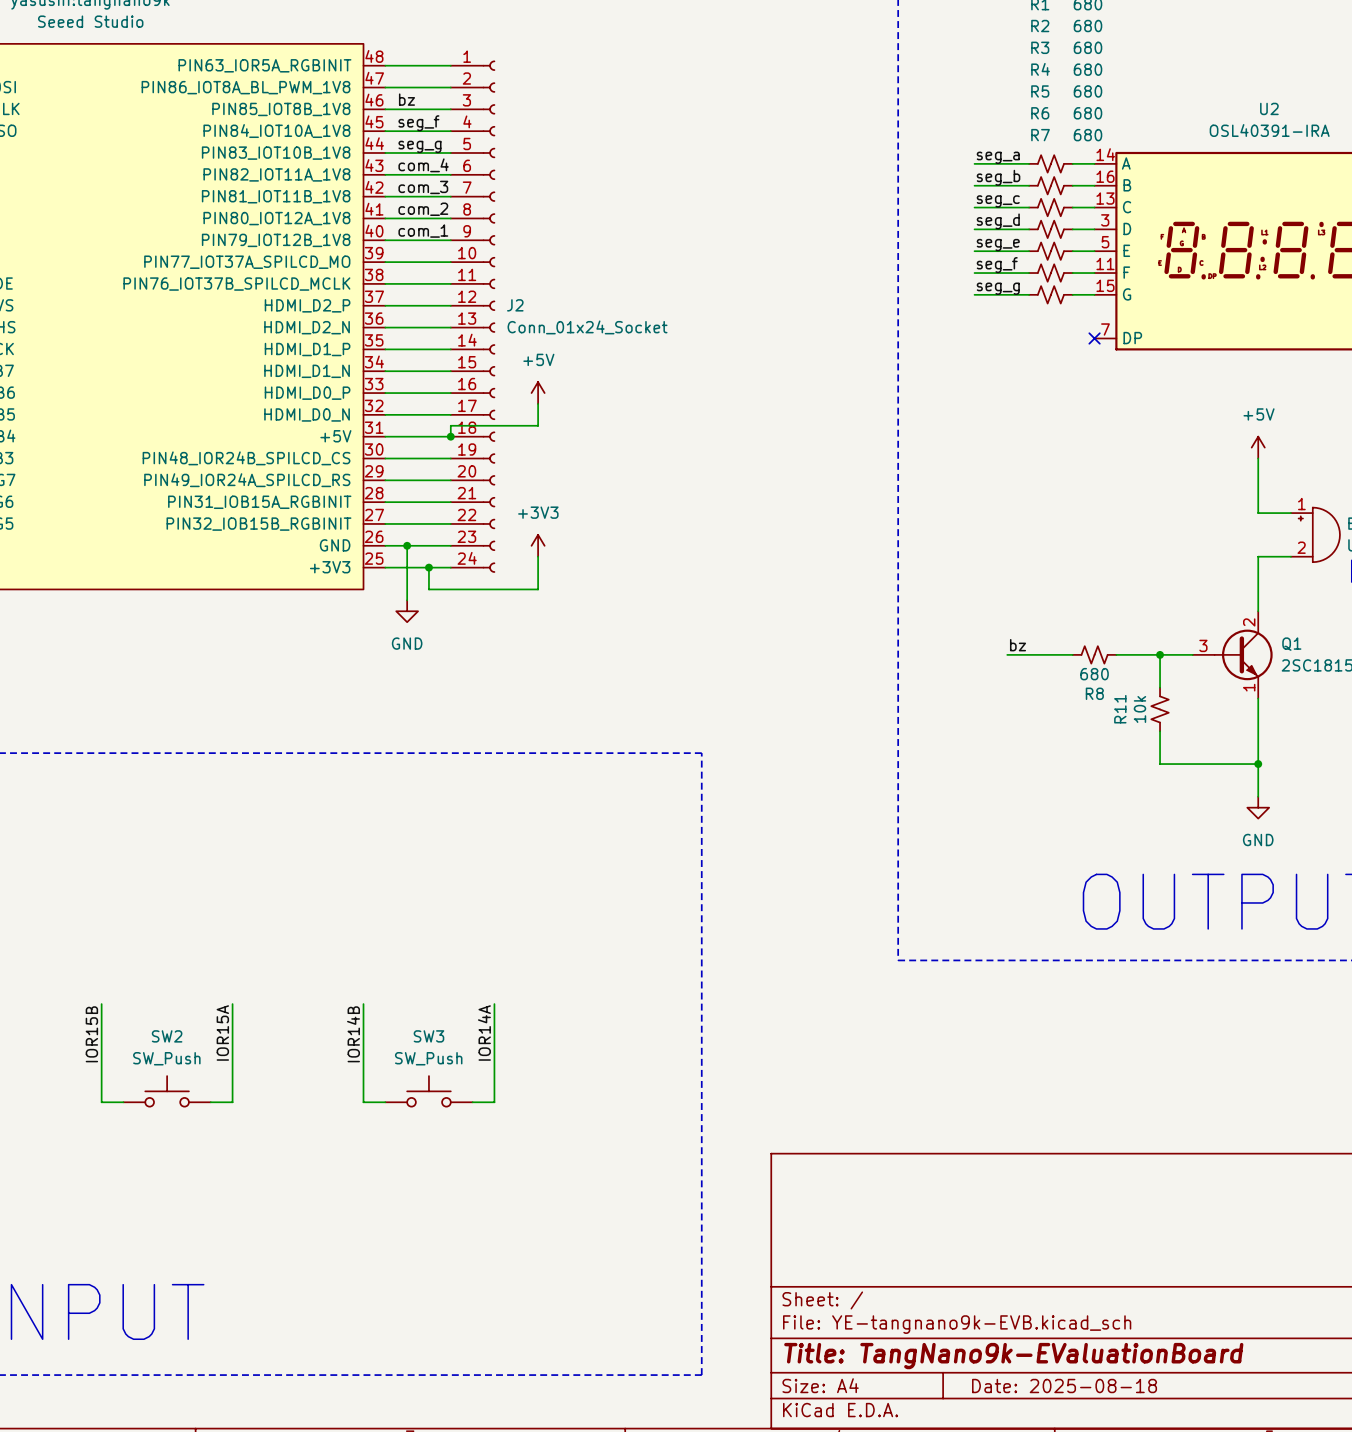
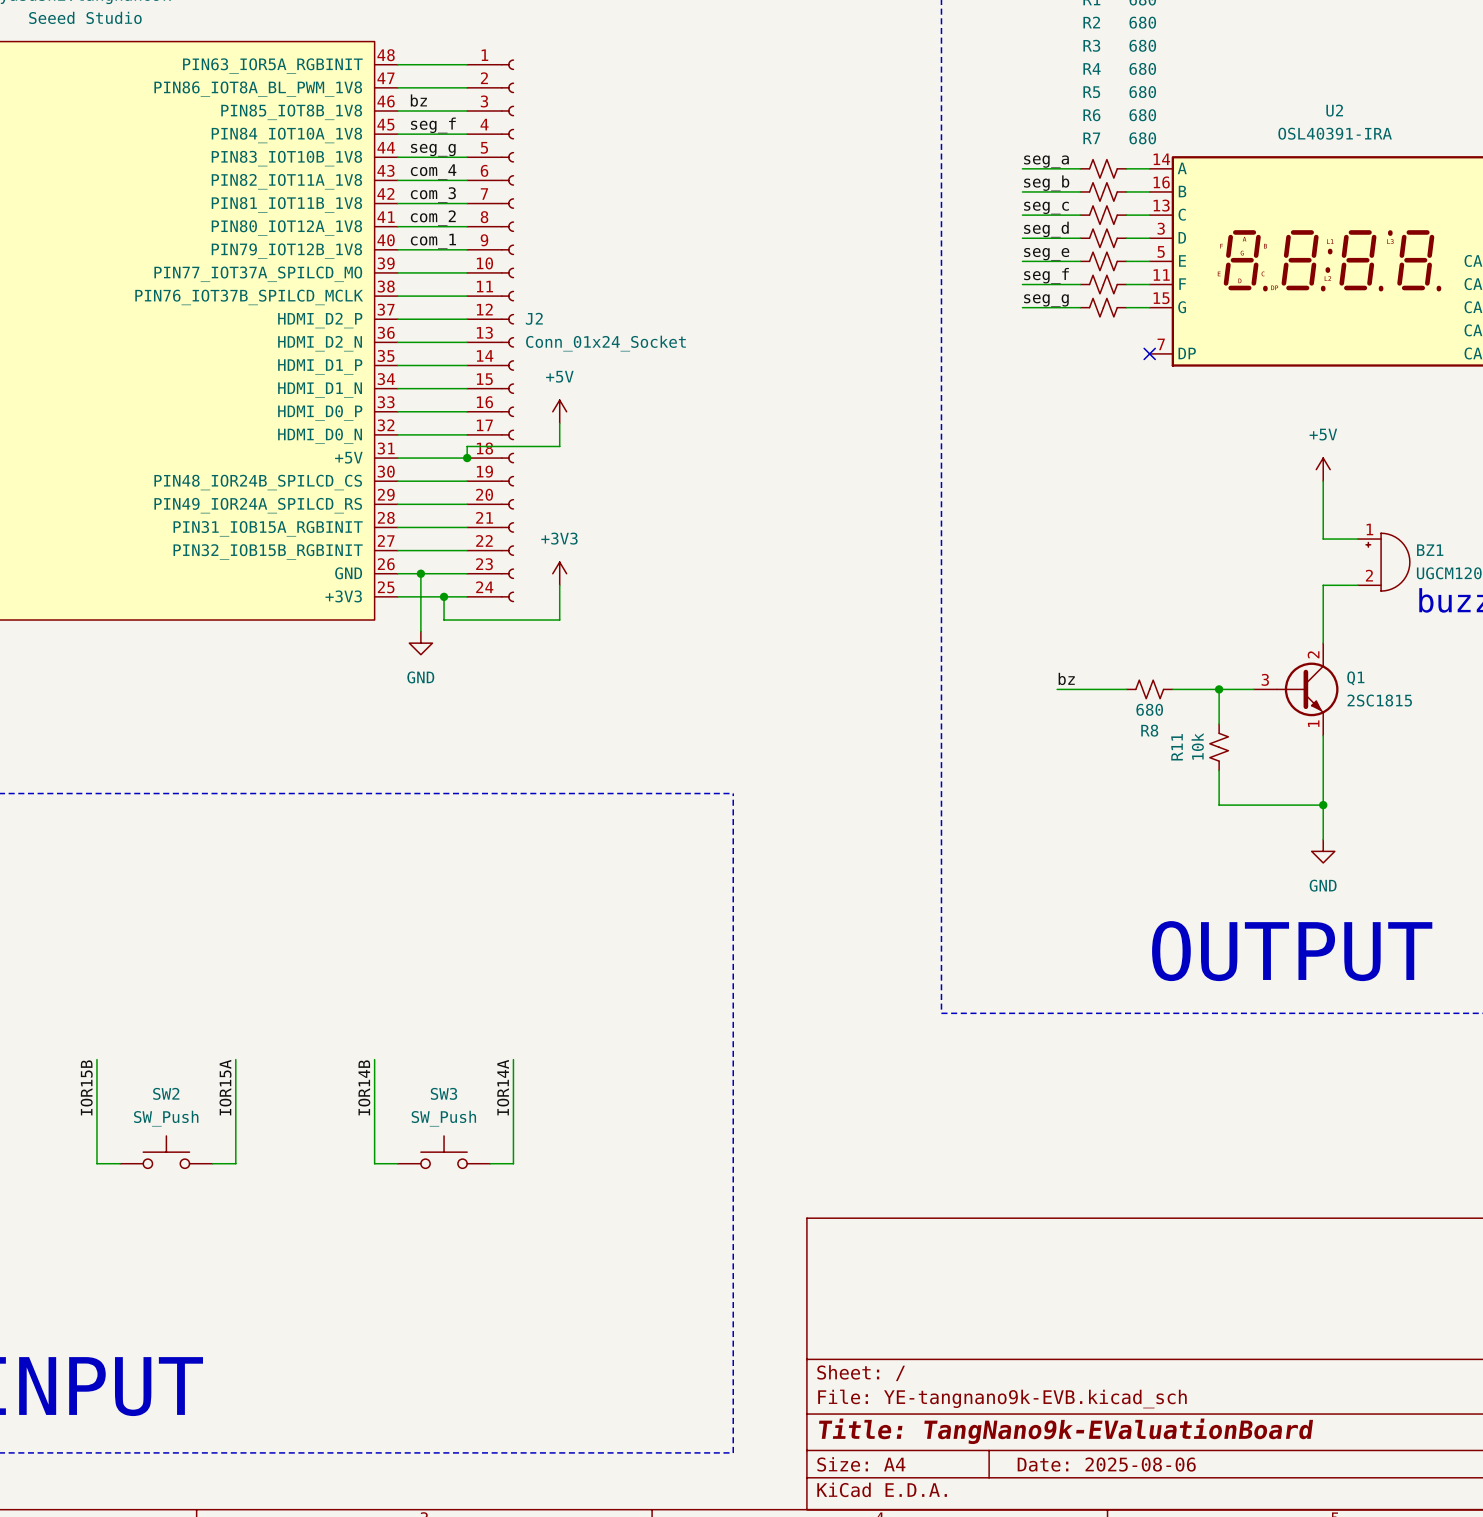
title block: Date: 2025-08-18 (1064, 1386) -> Date: 2025-08-06 (1106, 1464)

